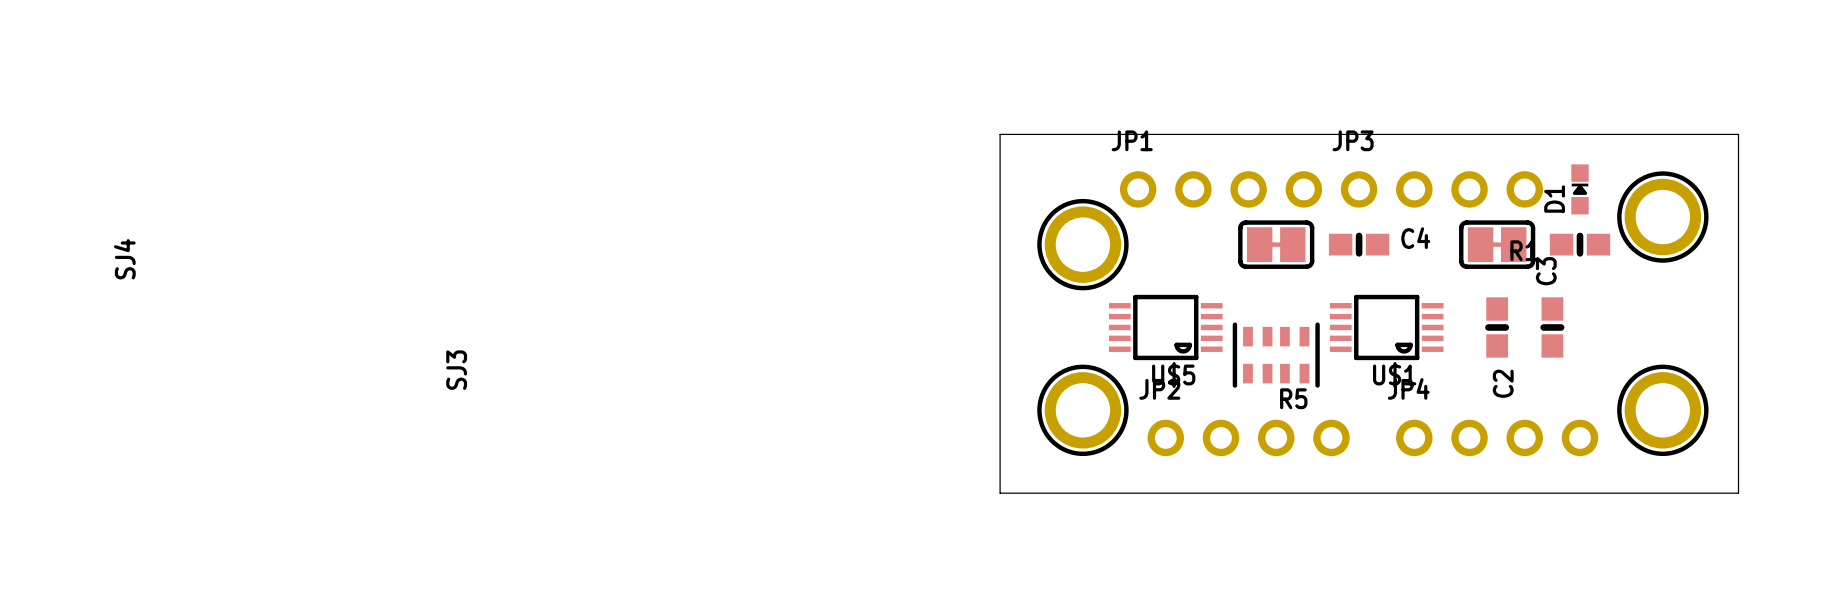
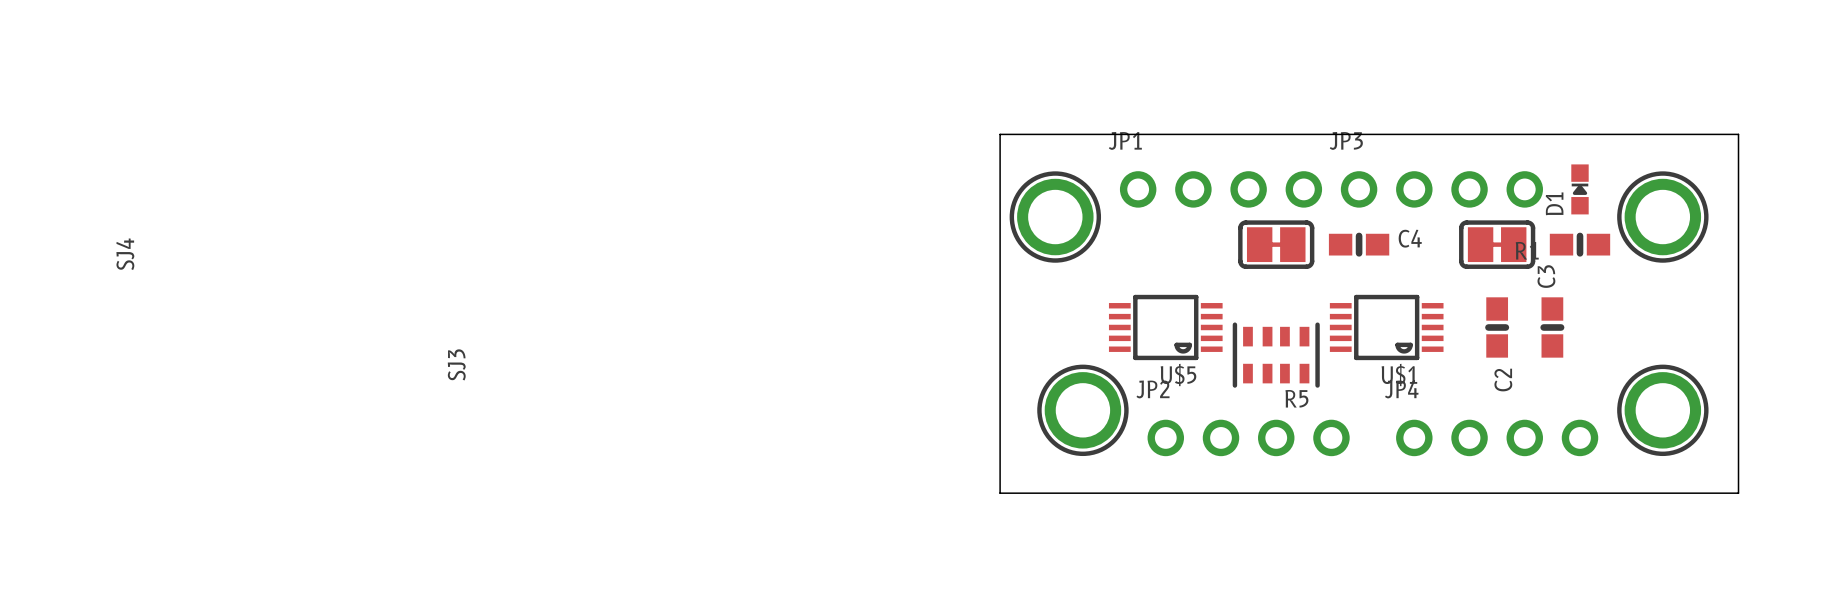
part position: (1082, 244) -> (1055, 217)

